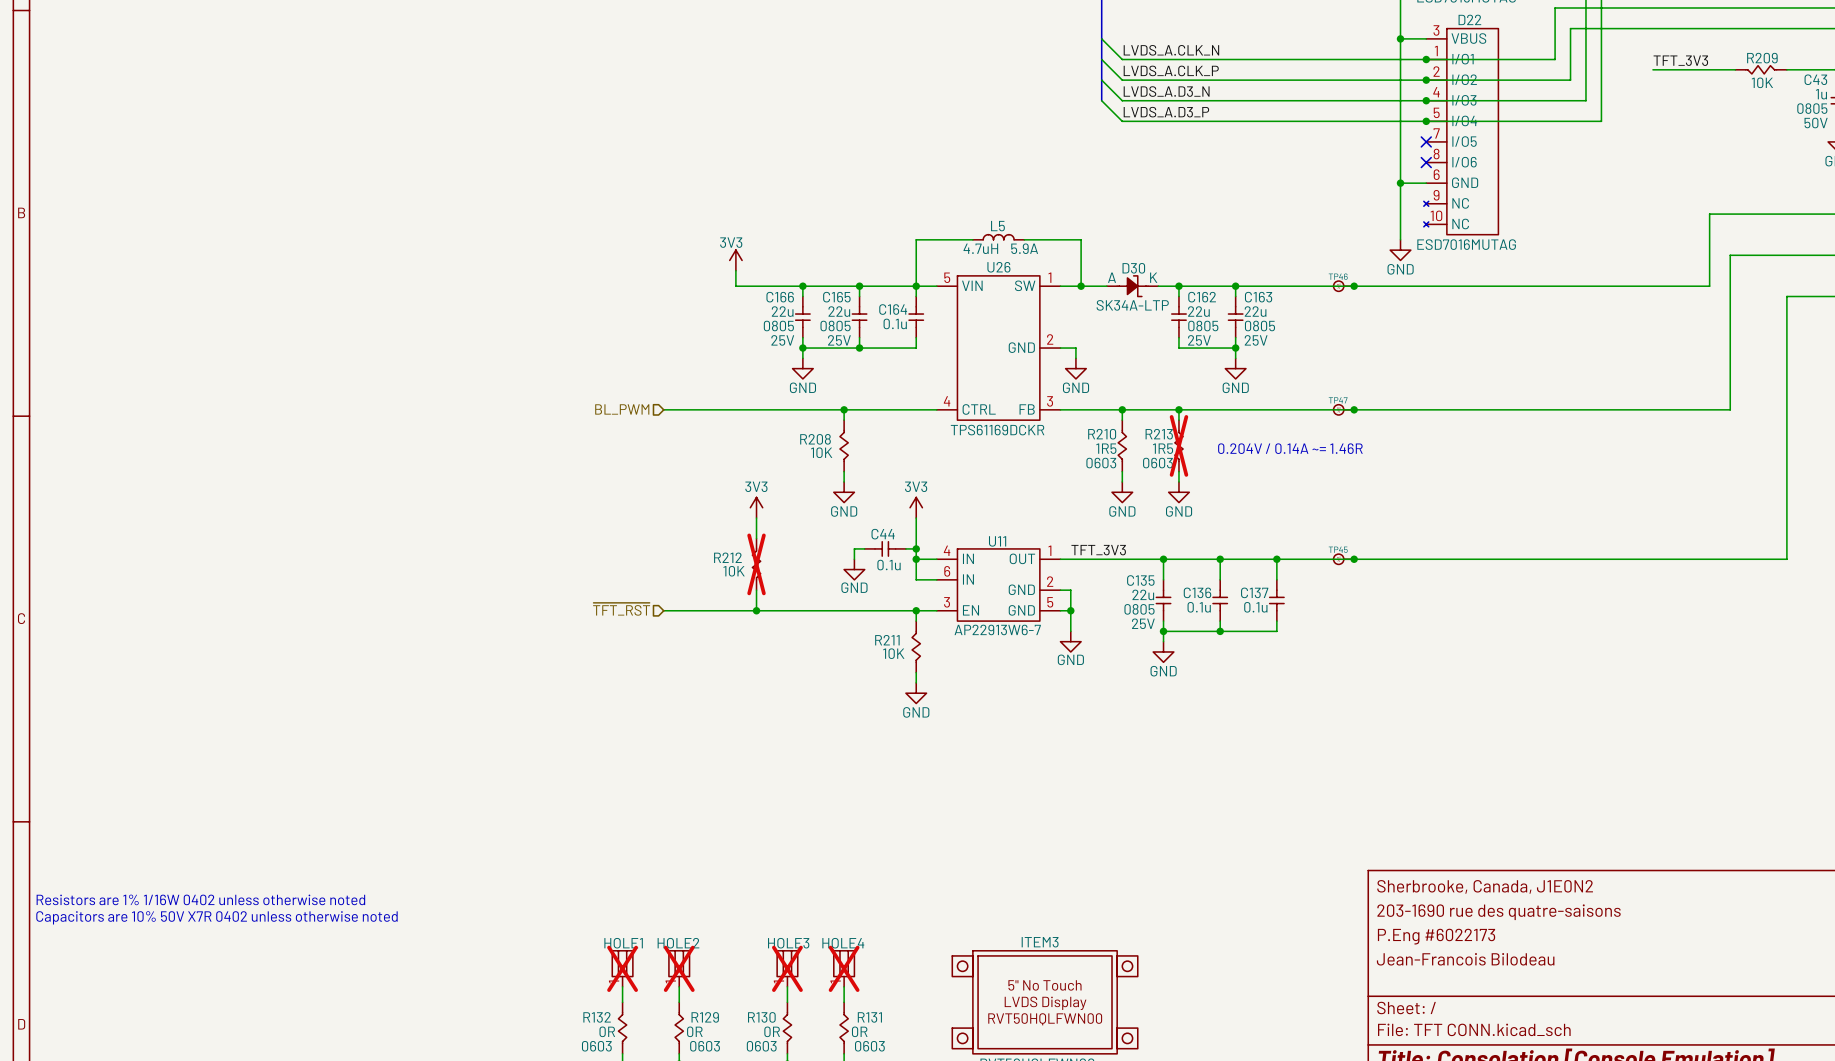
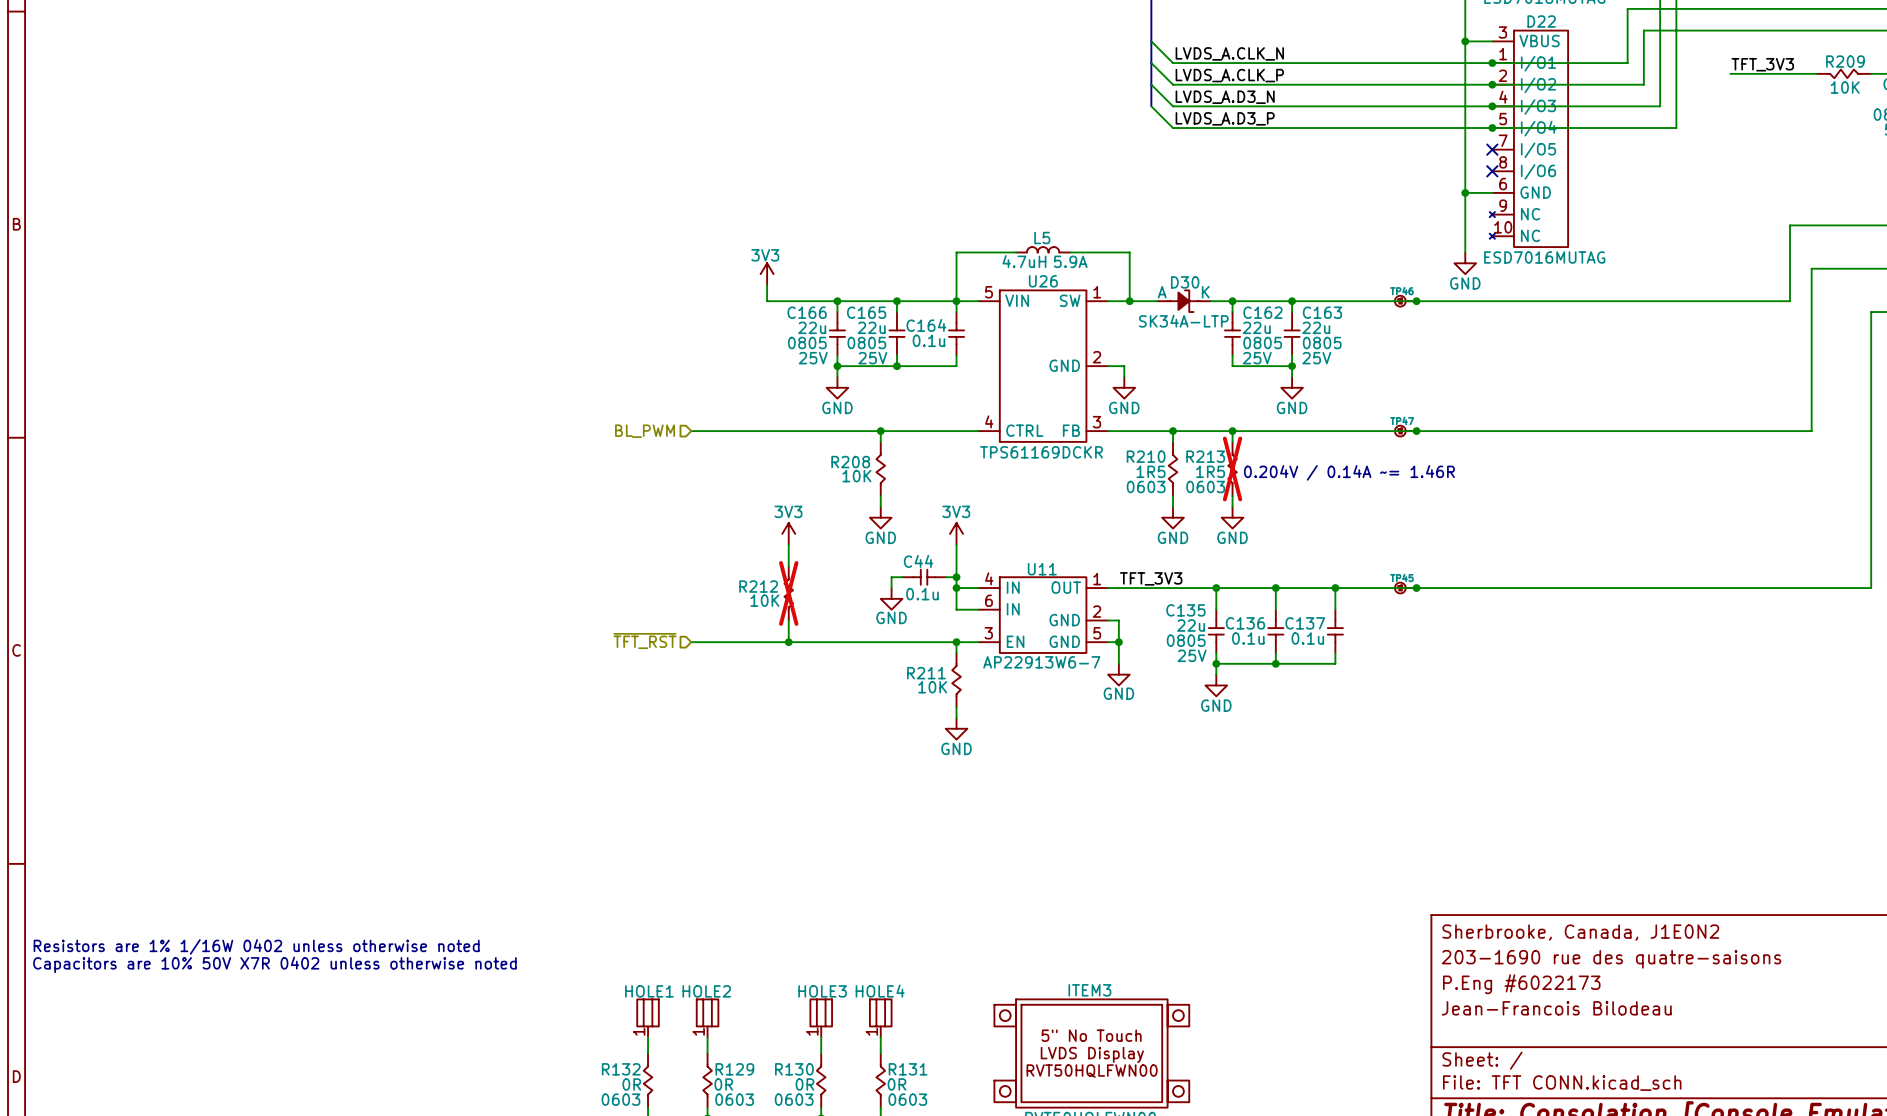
HOLE1 do-not-place cross: (622, 968) -> none
HOLE2 do-not-place cross: (679, 968) -> none
HOLE3 do-not-place cross: (787, 968) -> none
HOLE4 do-not-place cross: (844, 968) -> none

